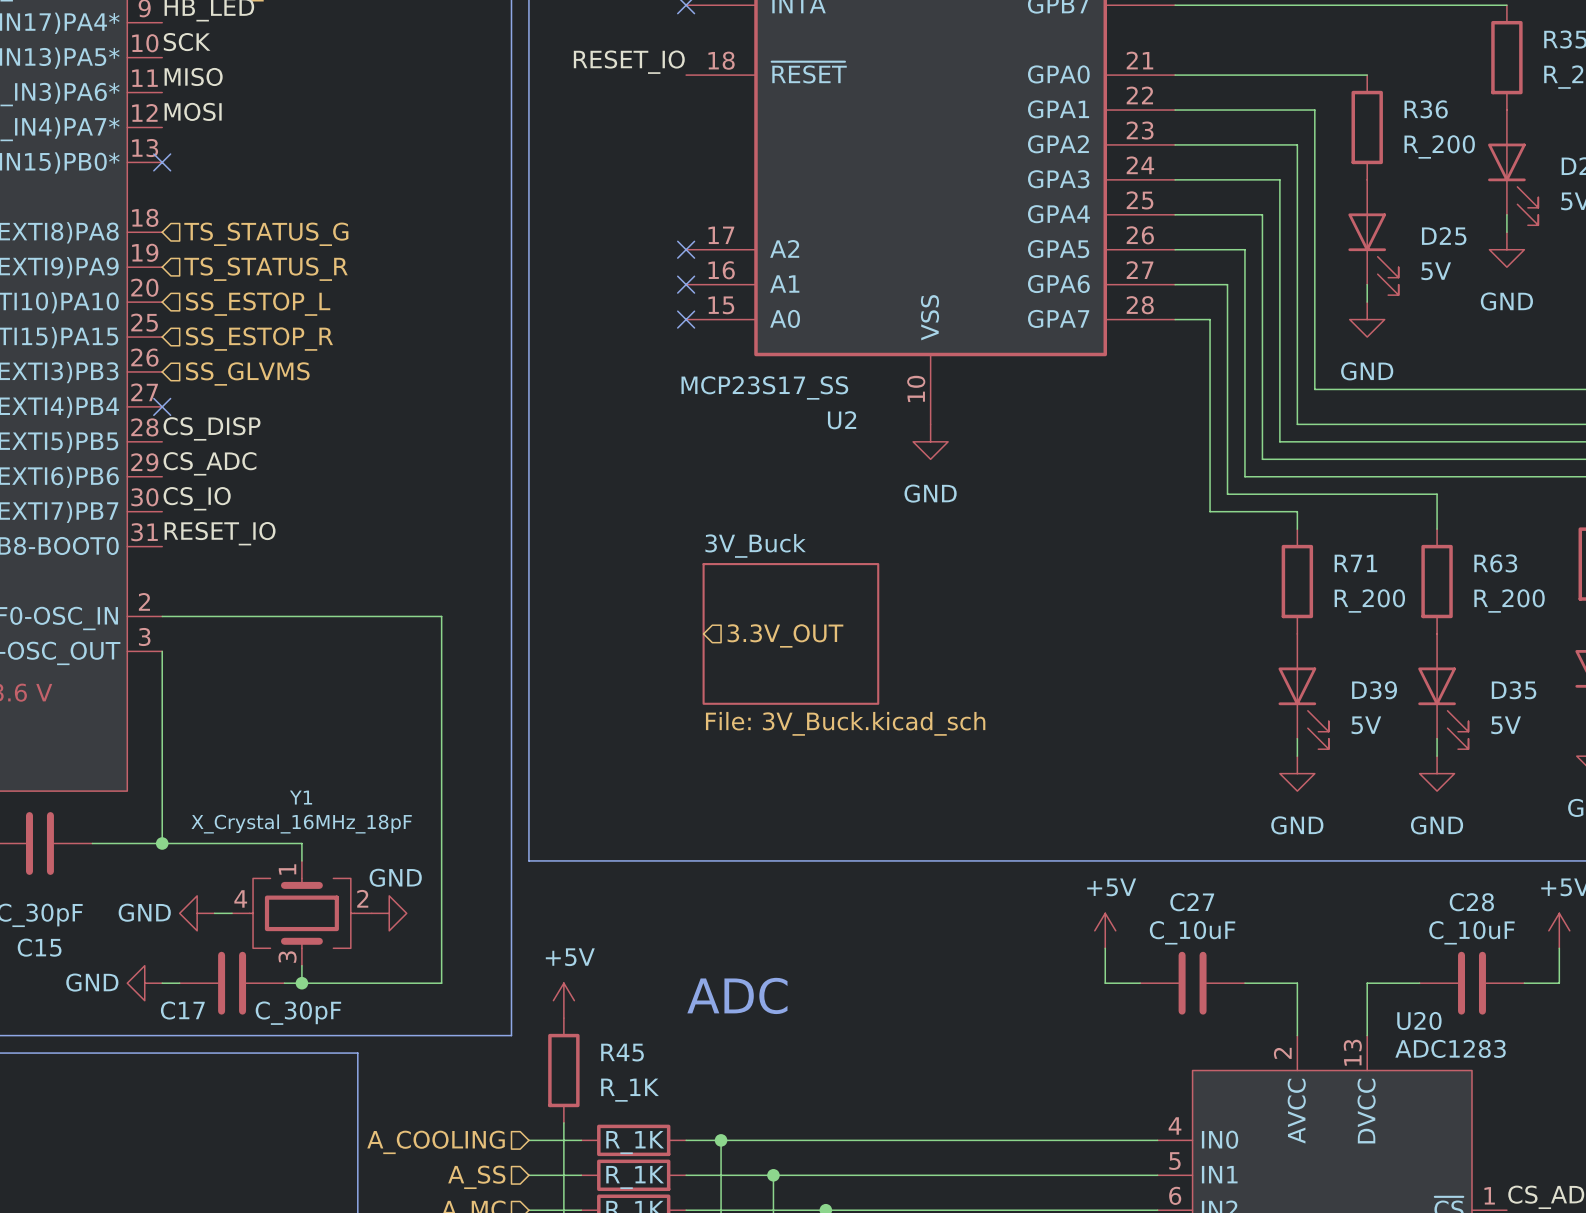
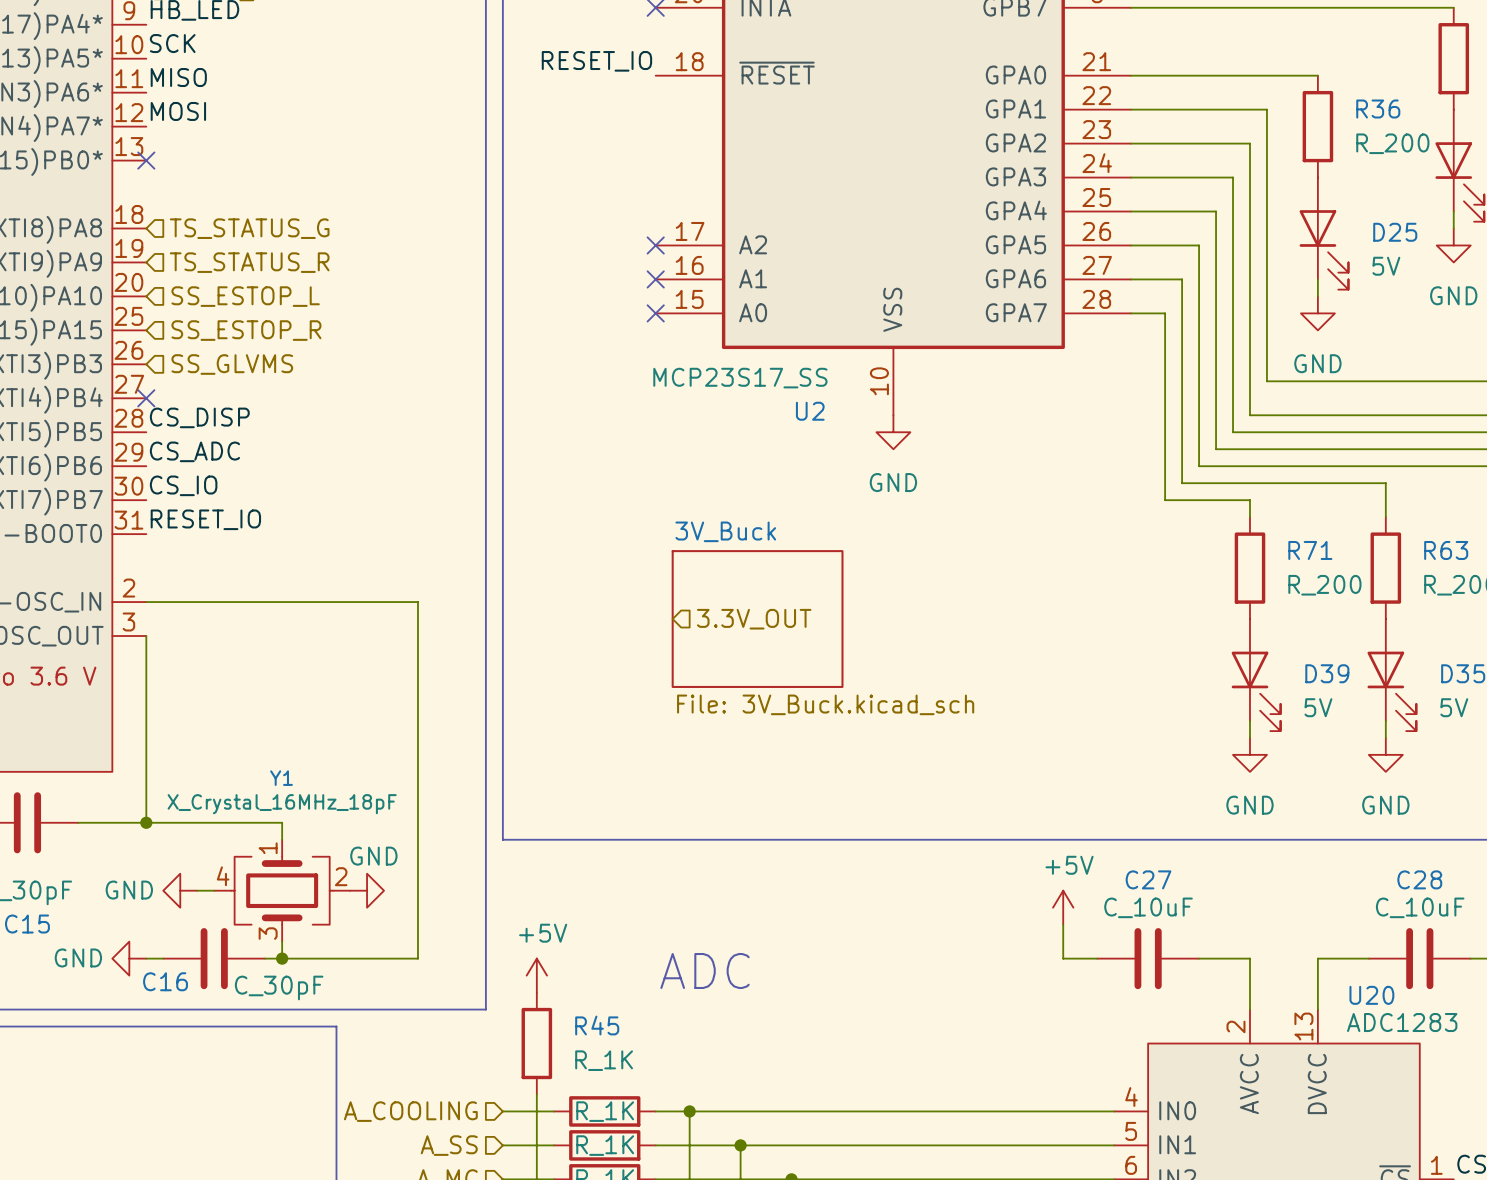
C17 name: C17 (182, 1010) -> C16 (165, 981)

